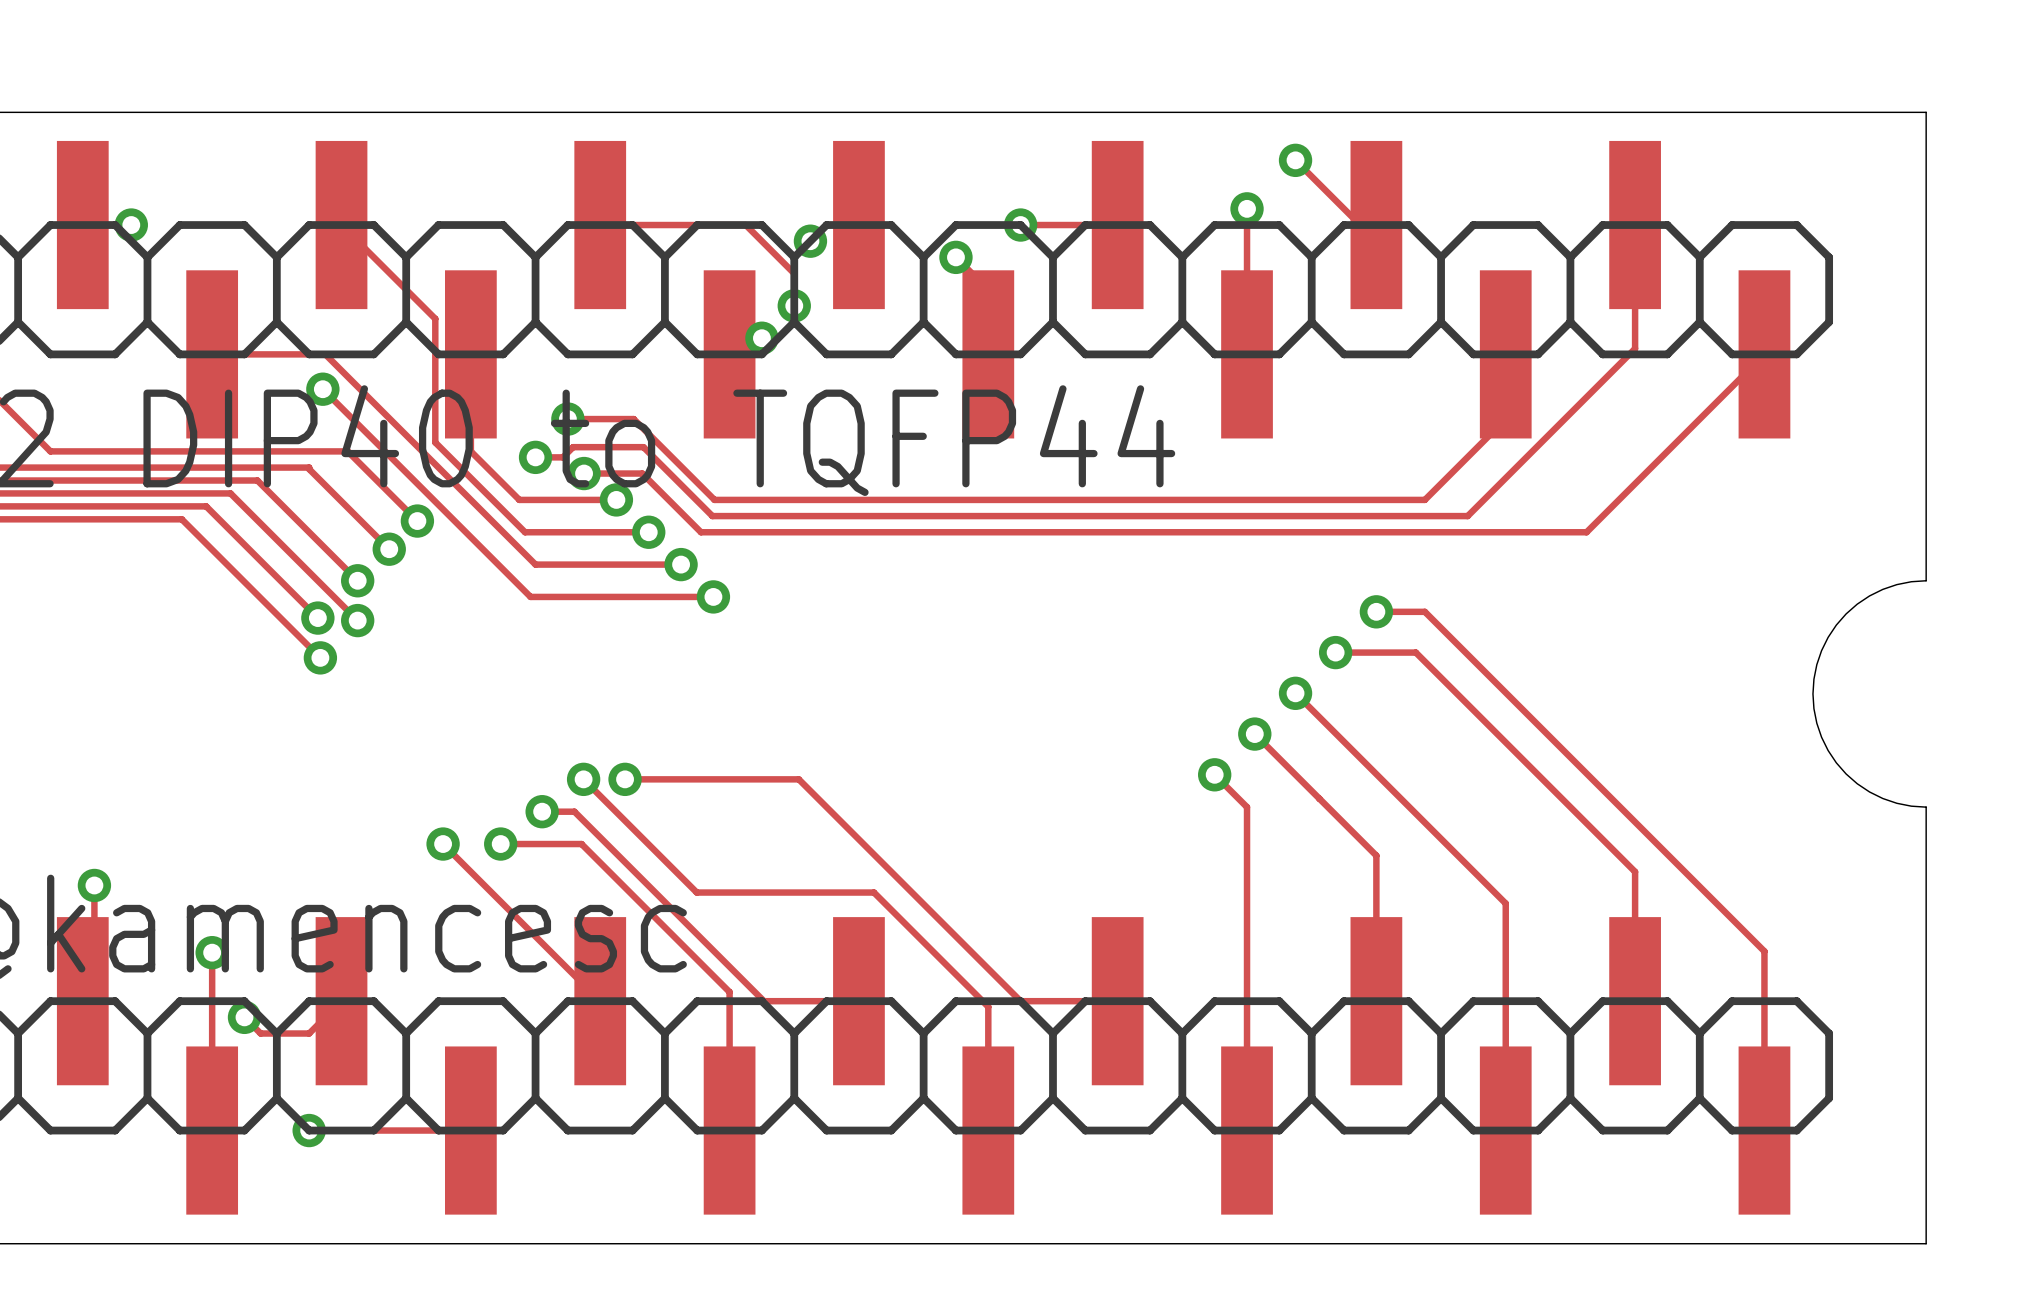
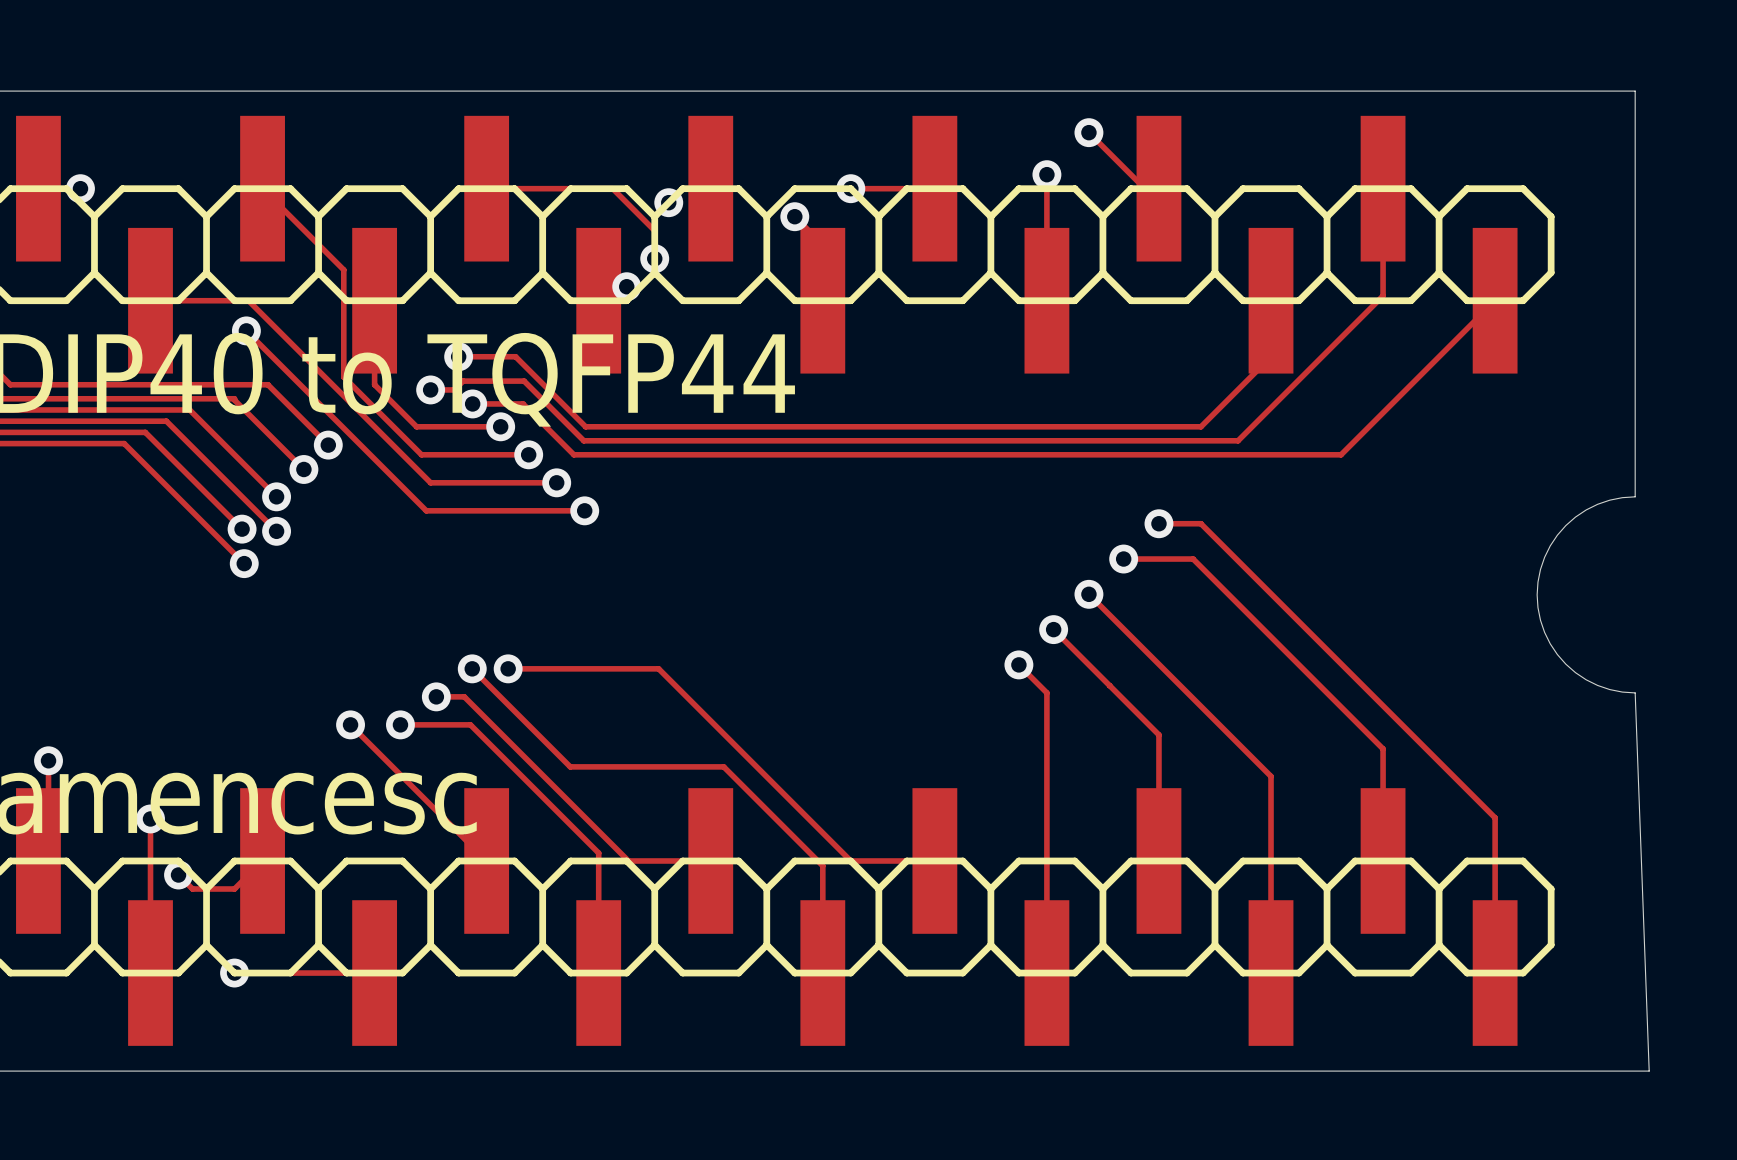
board edge: (1926, 807) (1926, 1243) -> (1635, 692) (1649, 1071) (1635, 1071)

